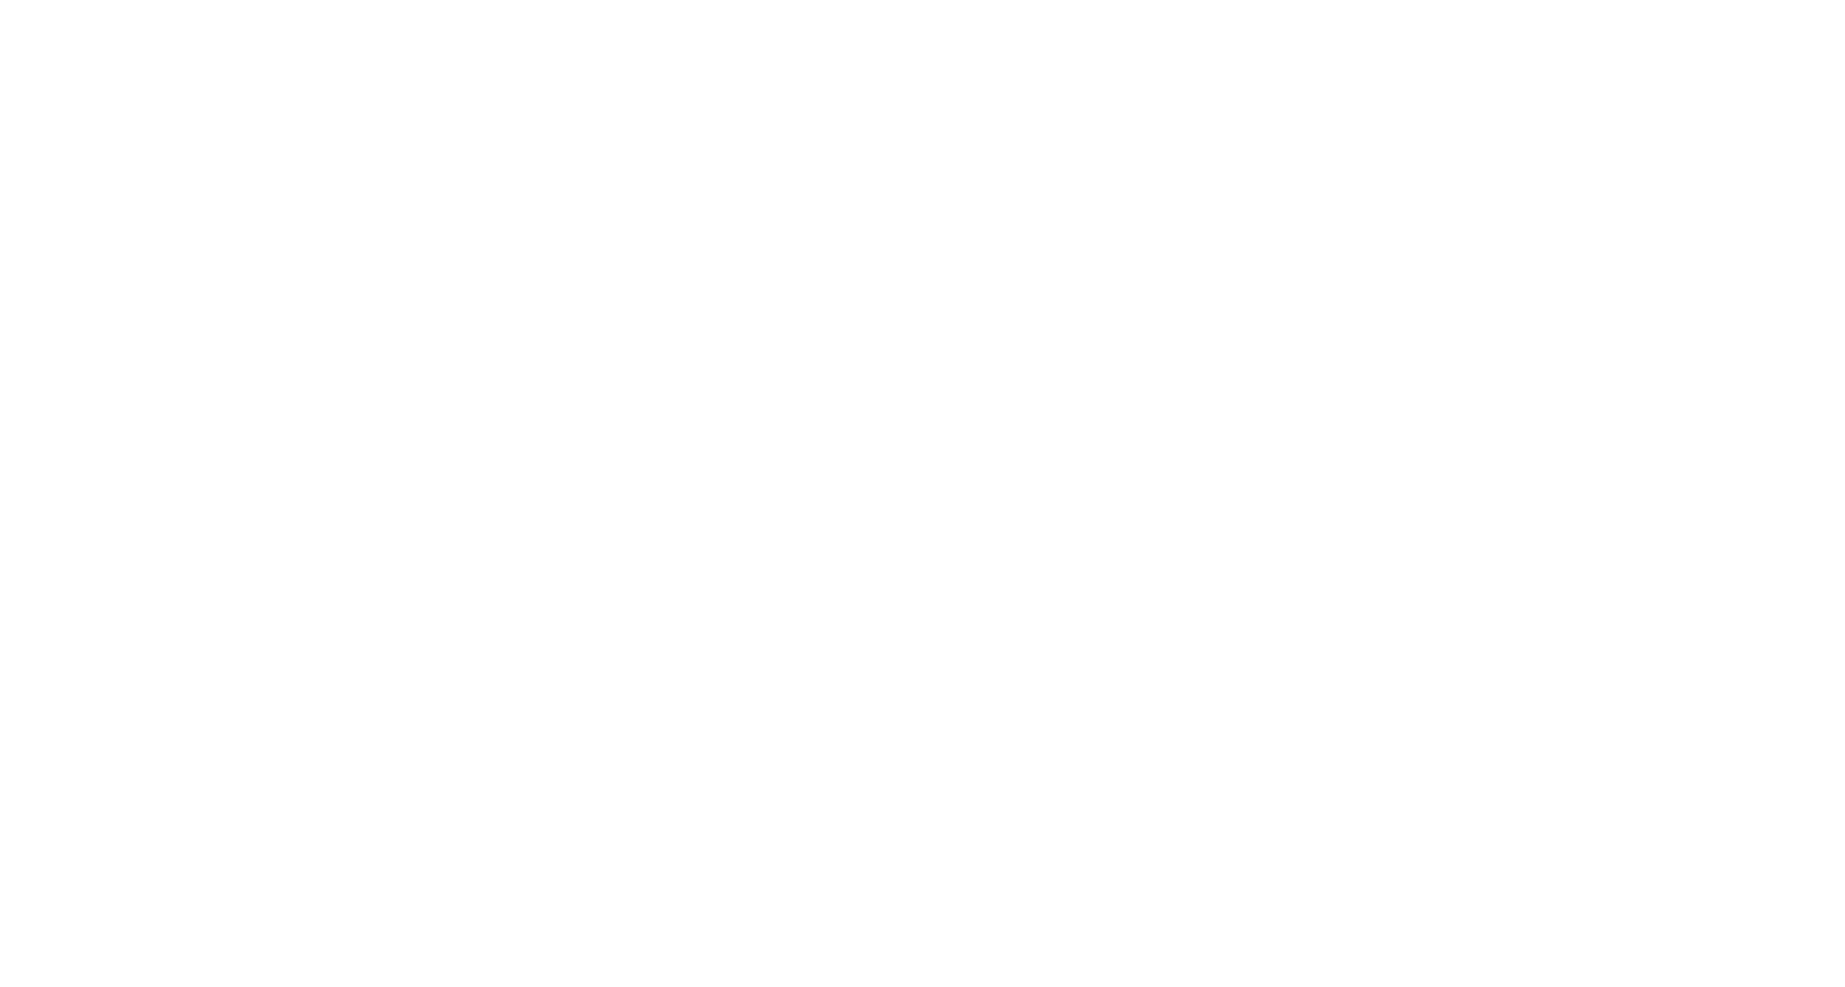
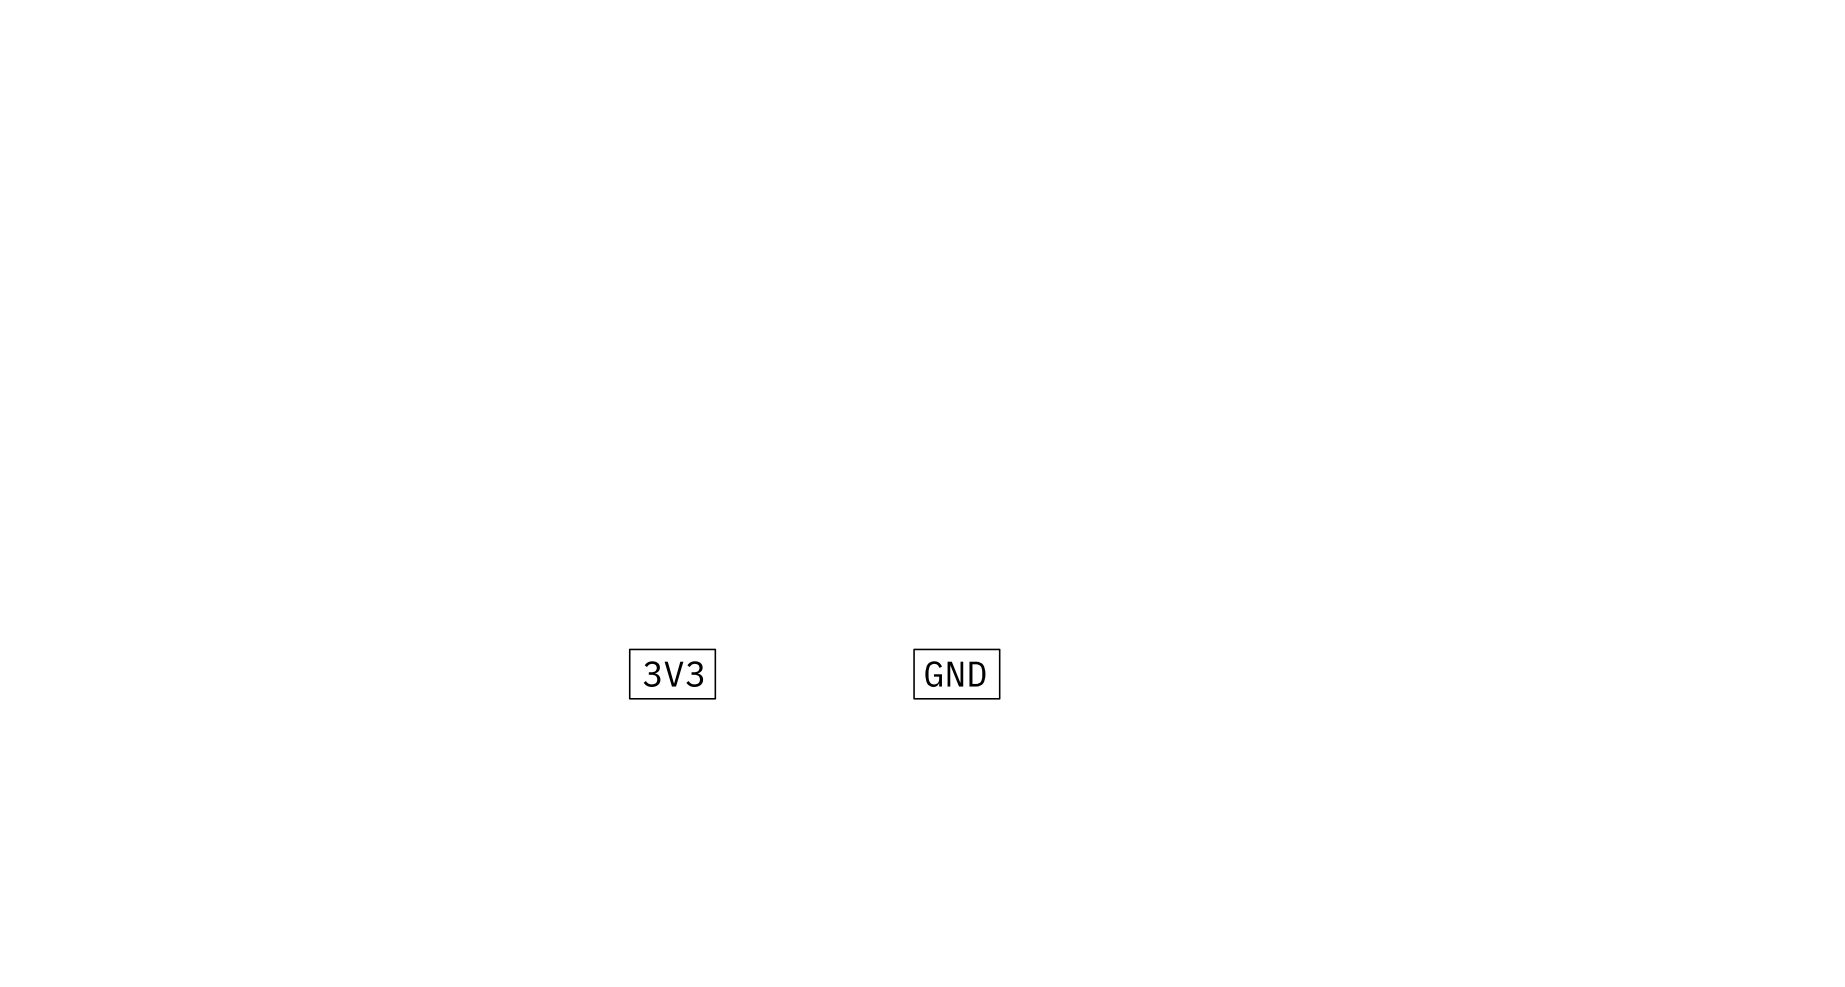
global label: none -> 3V3 (673, 674)
global label: none -> GND (955, 674)

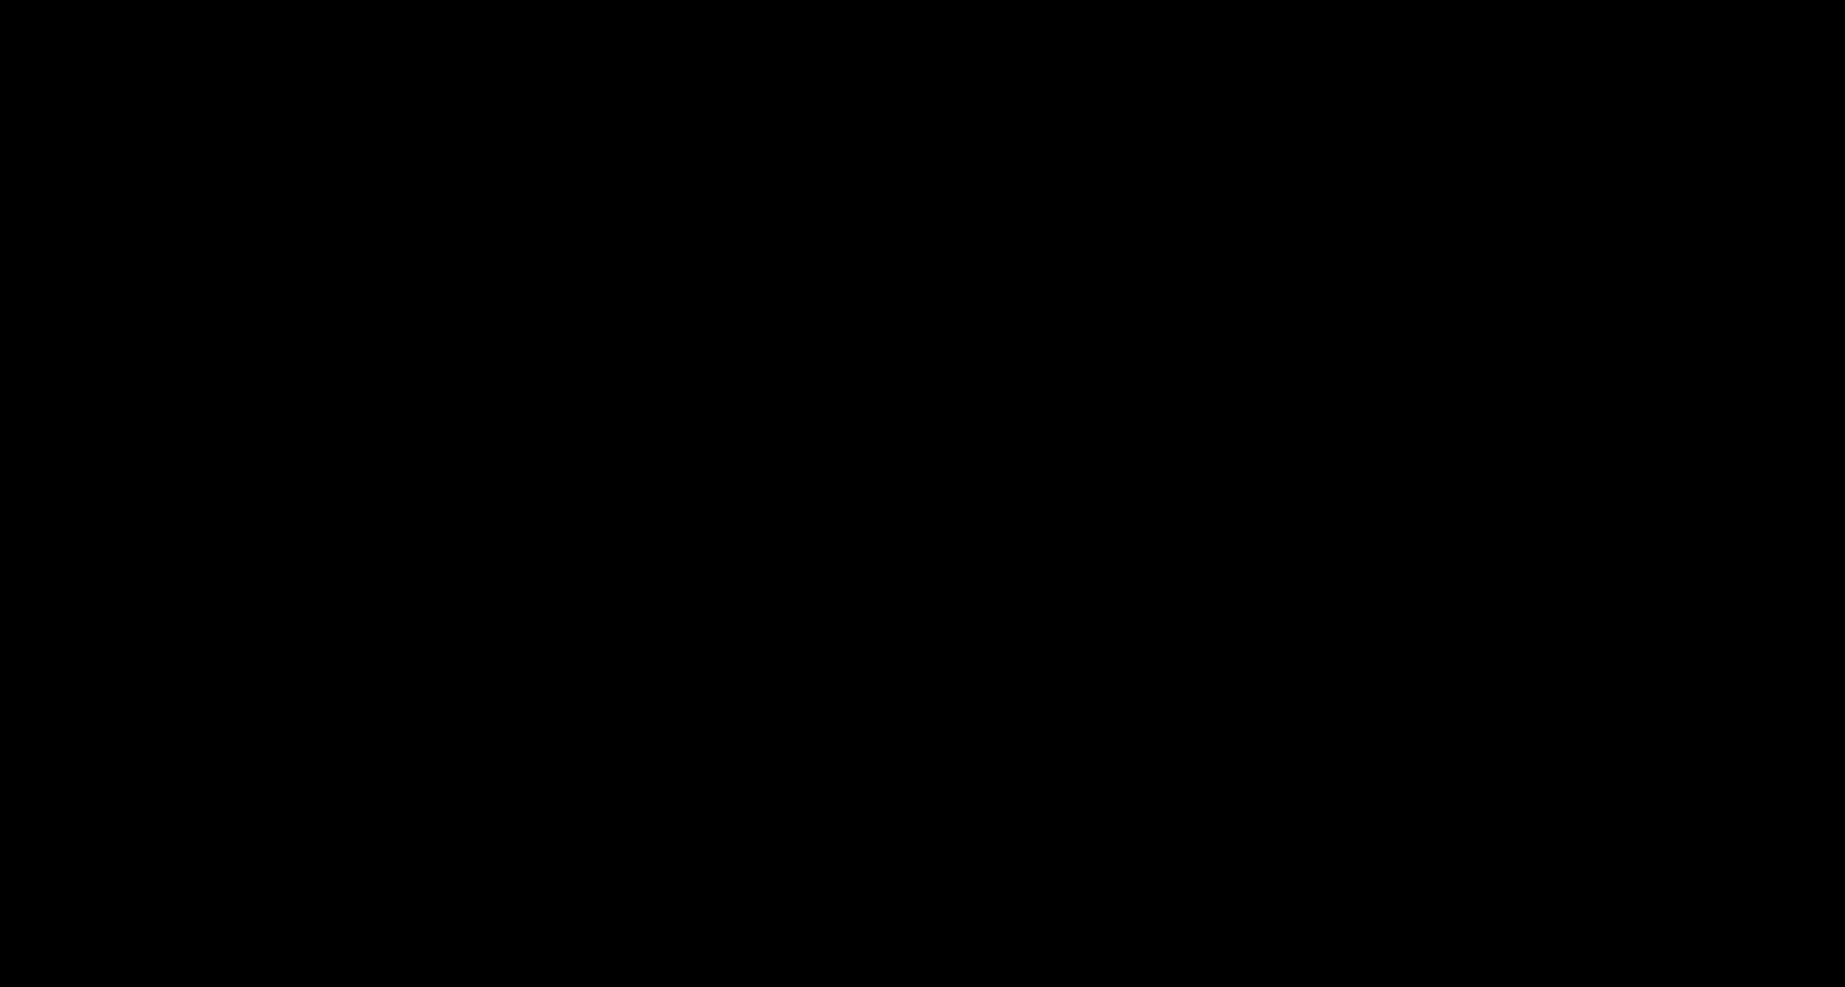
global label: 3V3 (673, 674) -> none
global label: GND (955, 674) -> none

